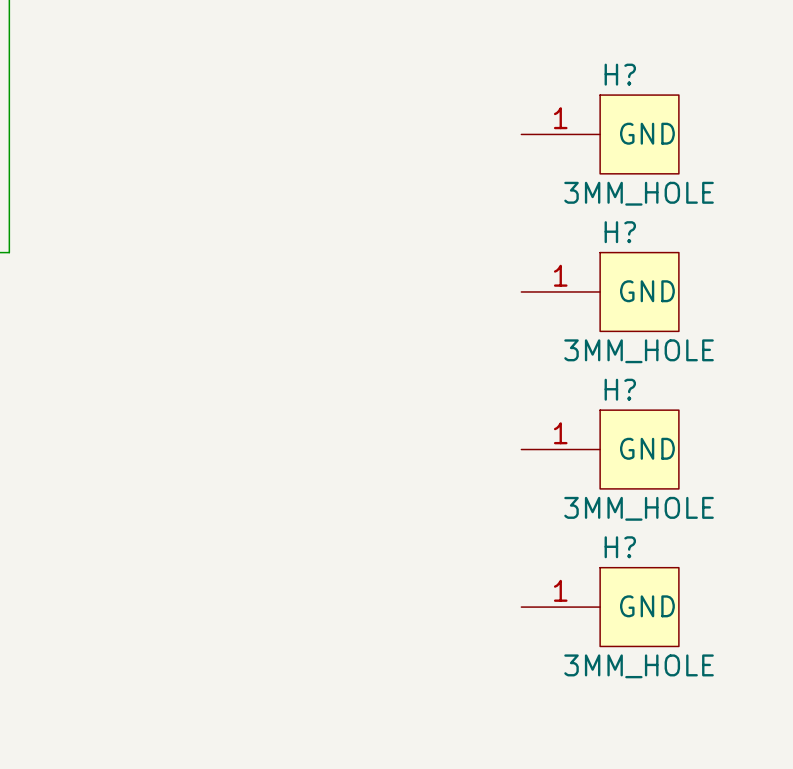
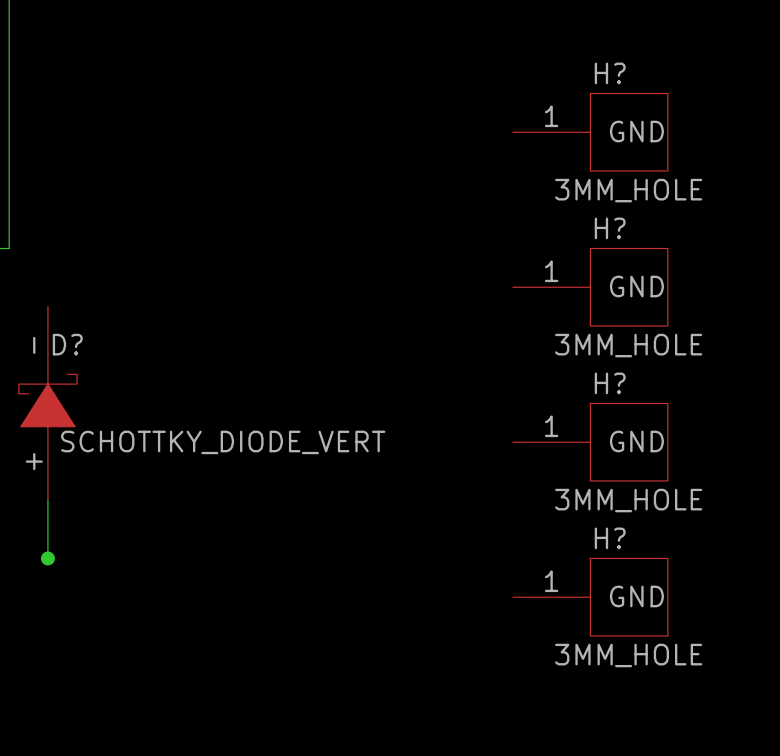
D?: none -> SCHOTTKY_DIODE_VERT (47, 403)
wire: none -> (47, 500) (47, 558)
junction: none -> (47, 558)

